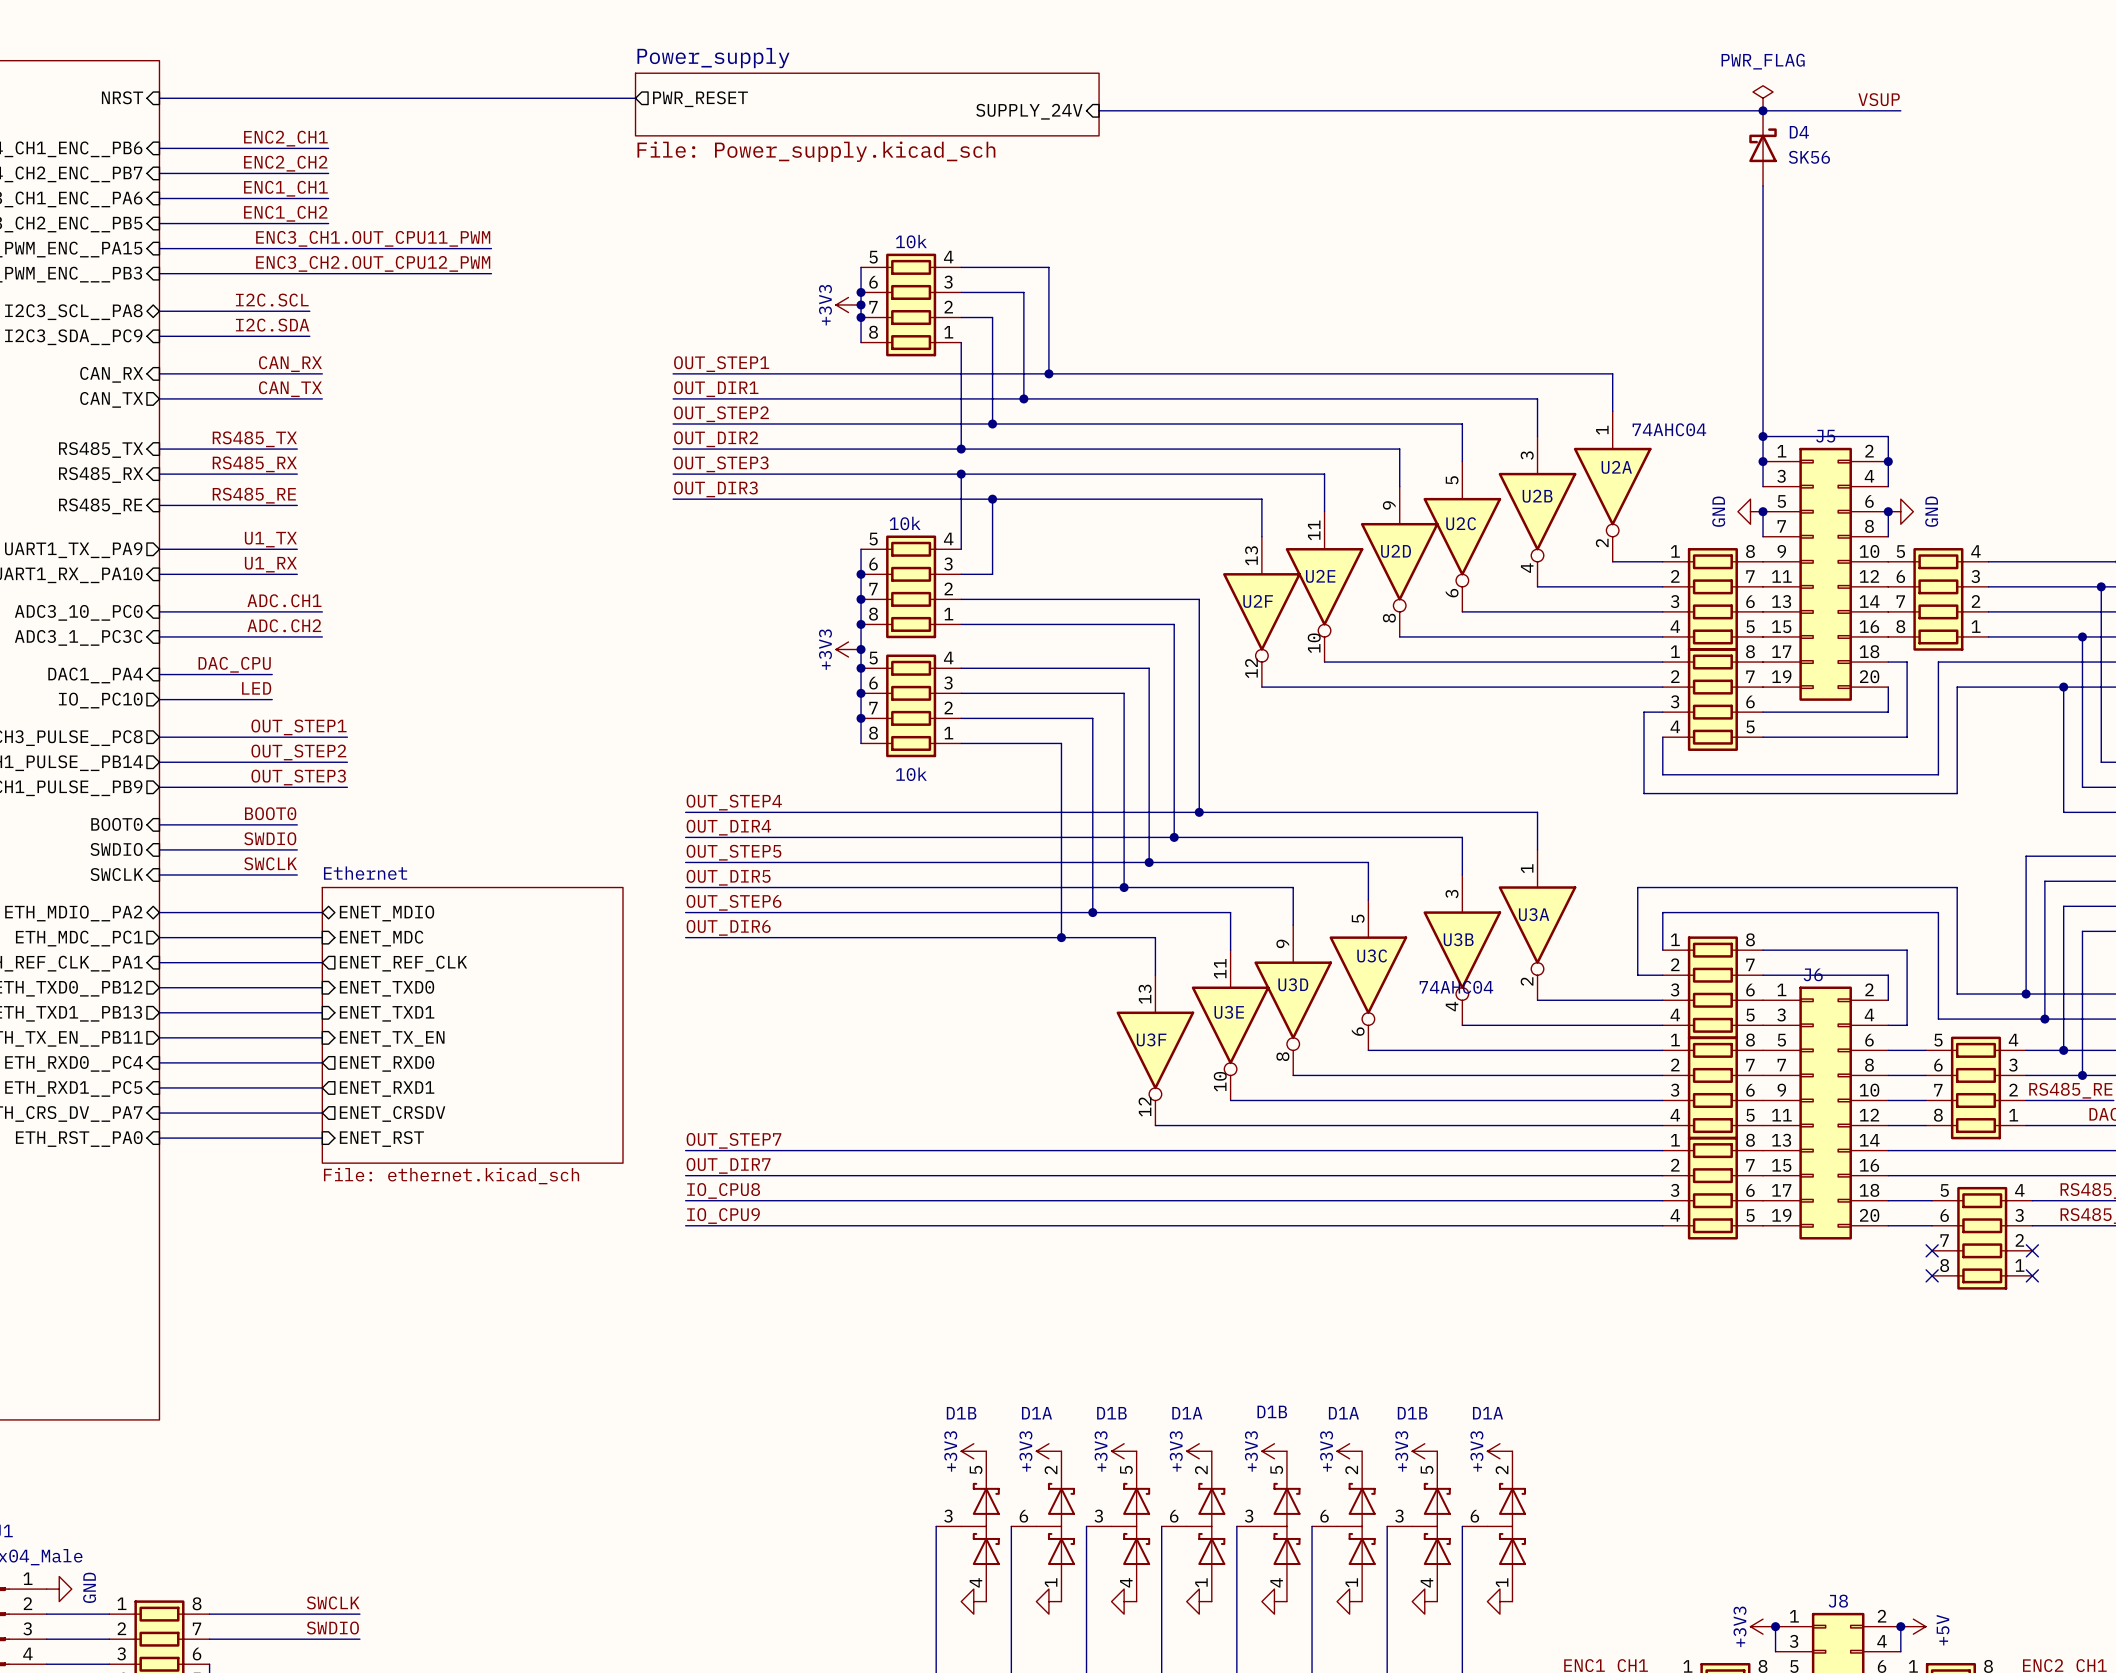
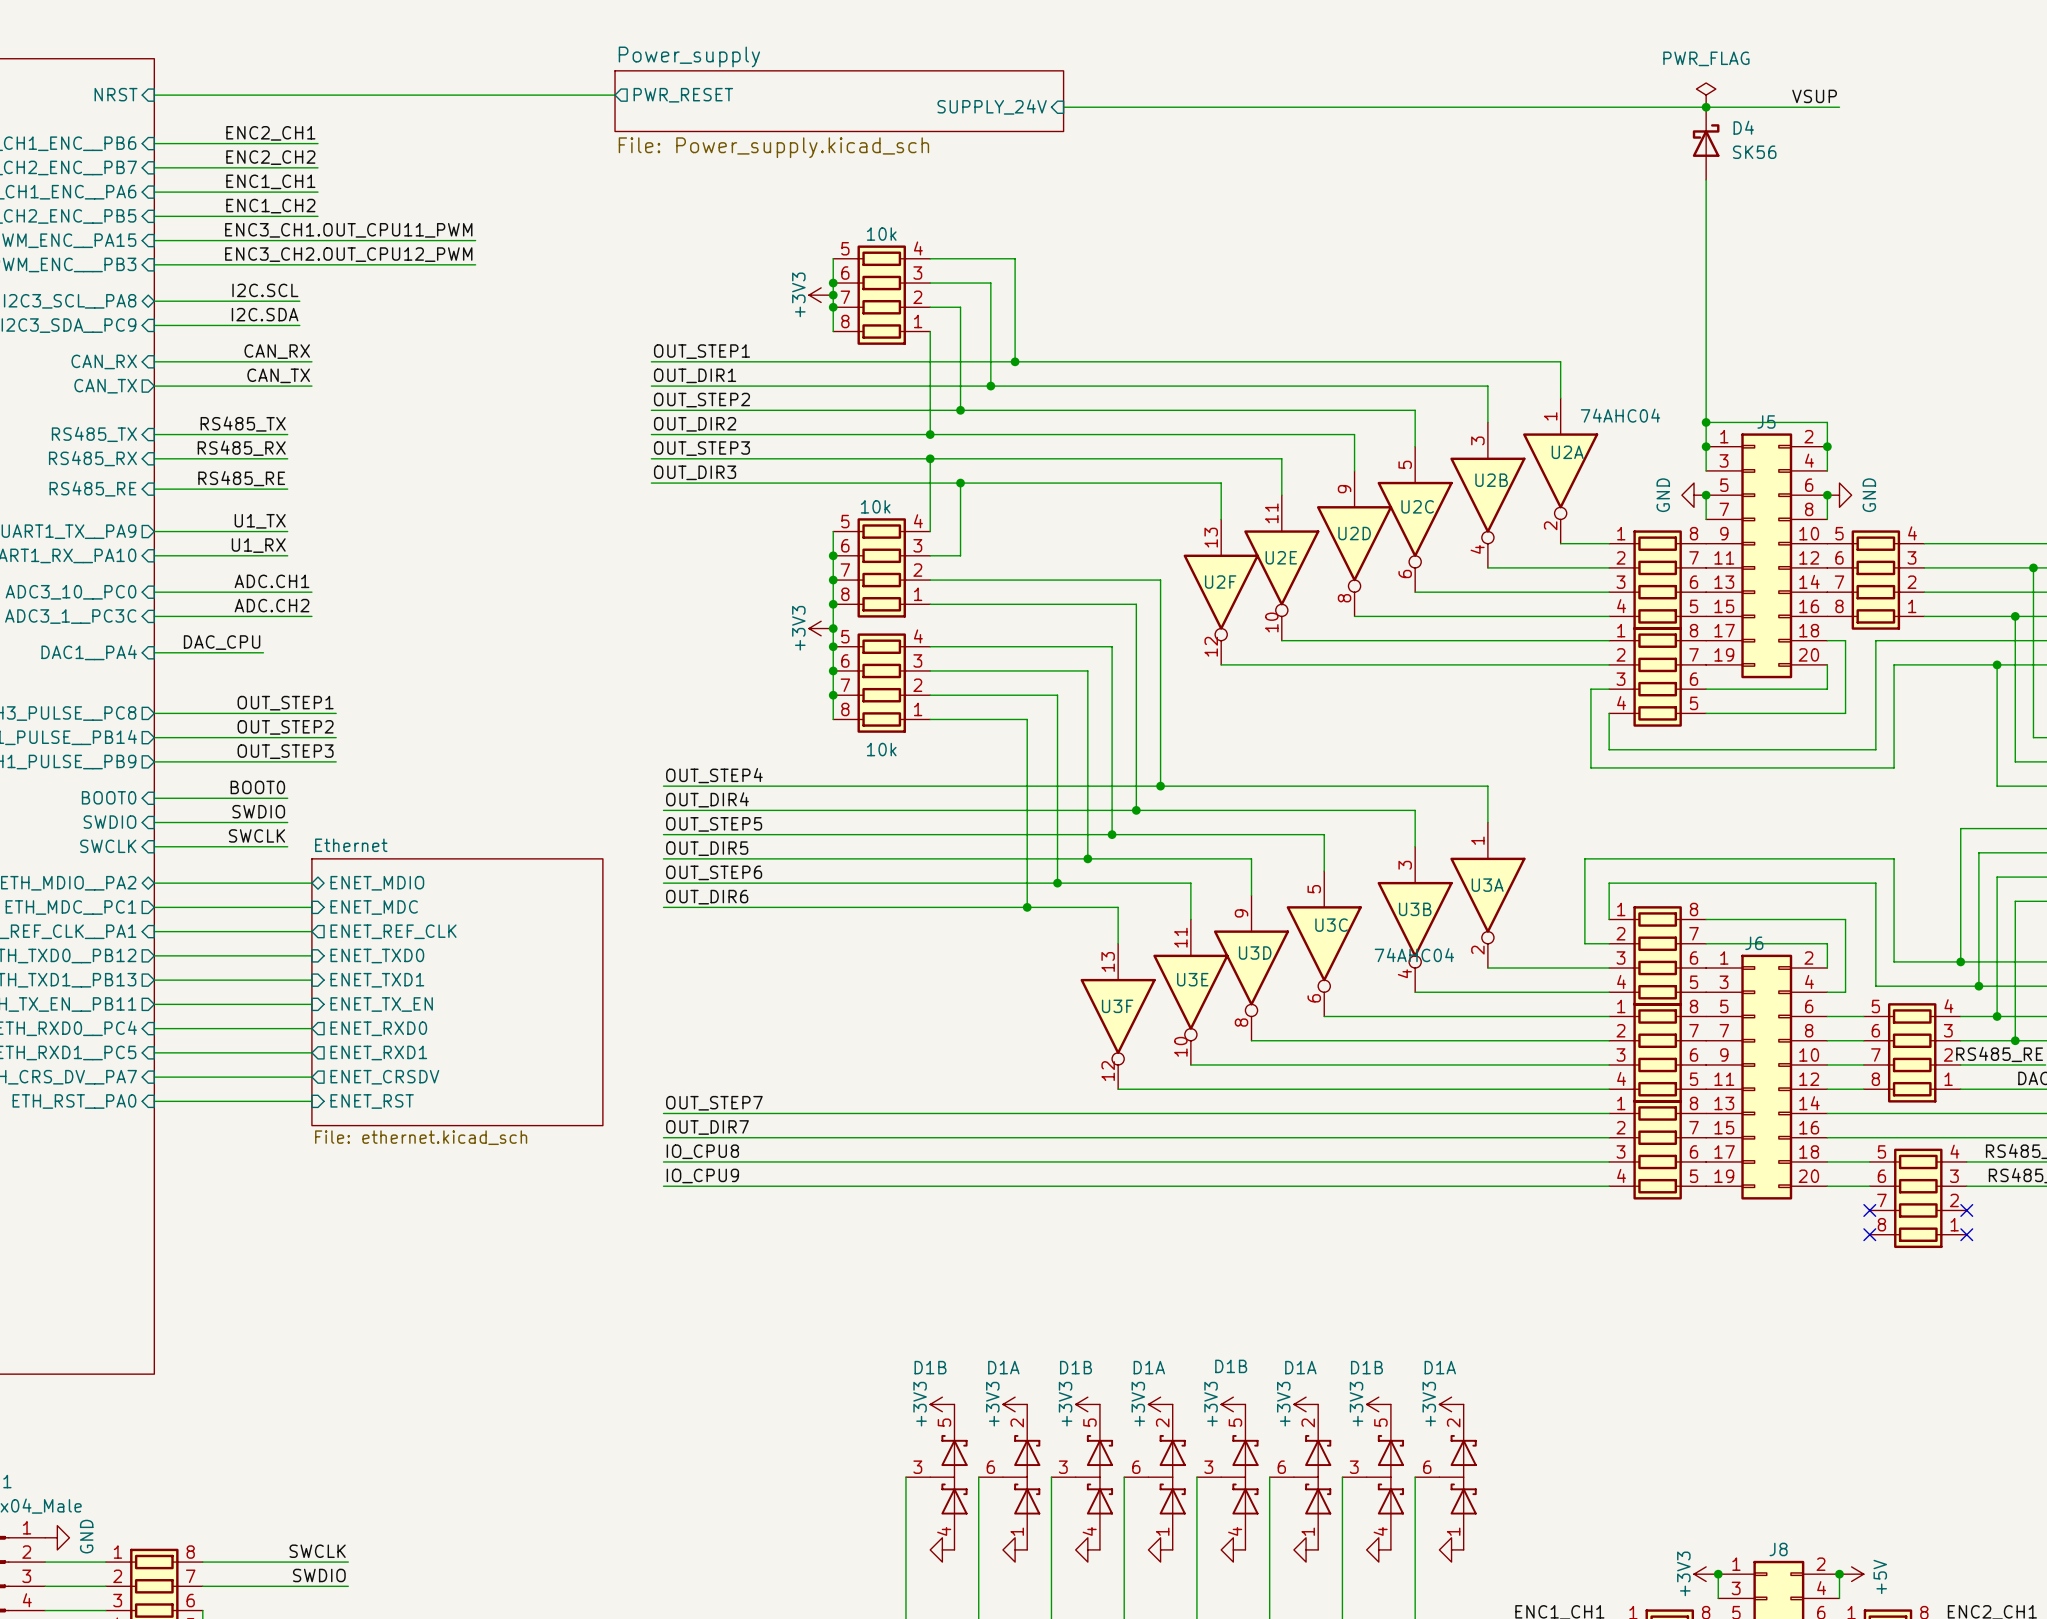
label: LED (256, 688) -> none
wire: (159, 699) (272, 699) -> none
sheet pin: IO__PC10 (100, 700) -> none

